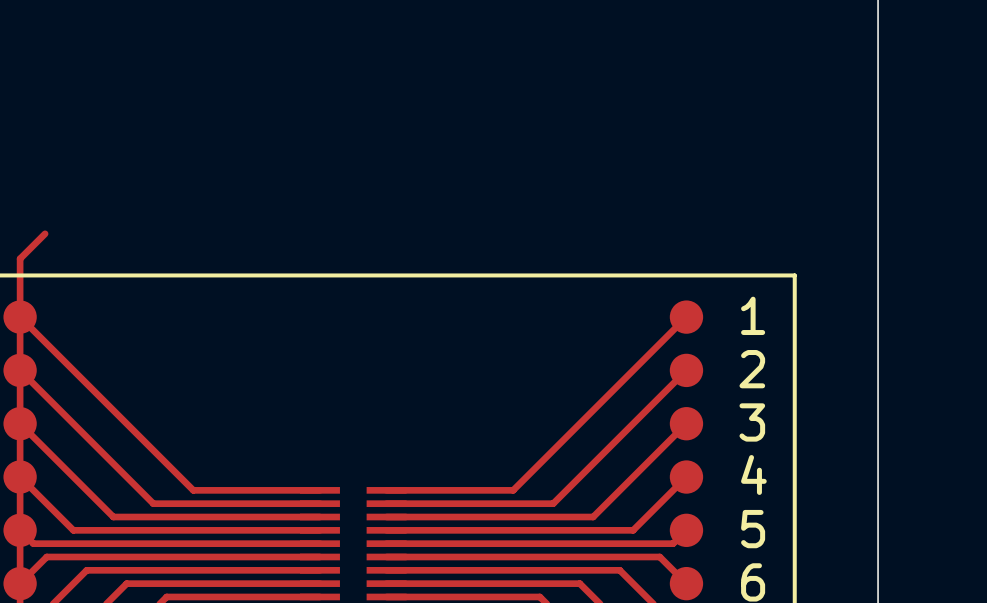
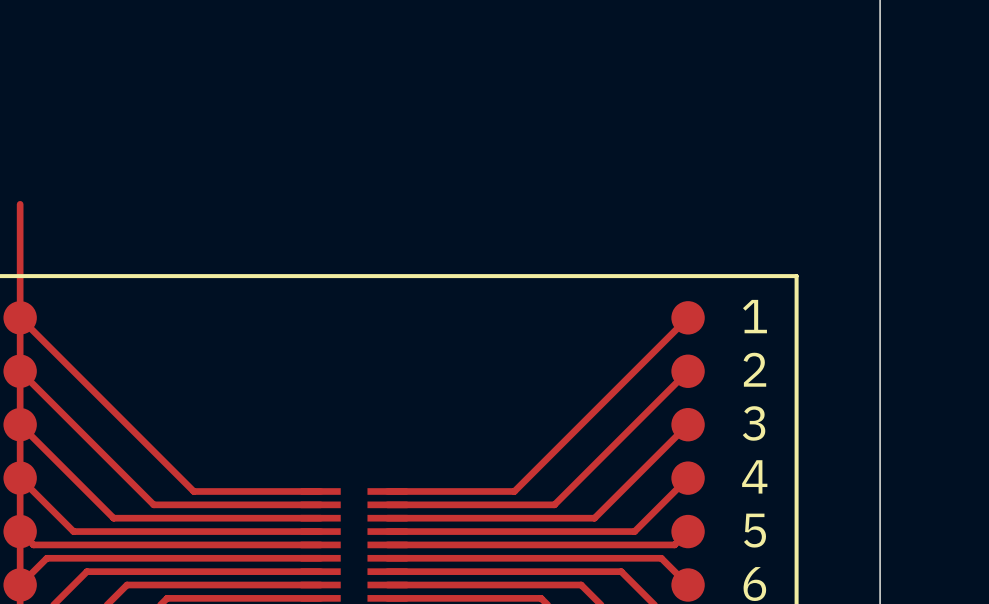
top track: (45, 233) (20, 258) -> (20, 204) (20, 259)

